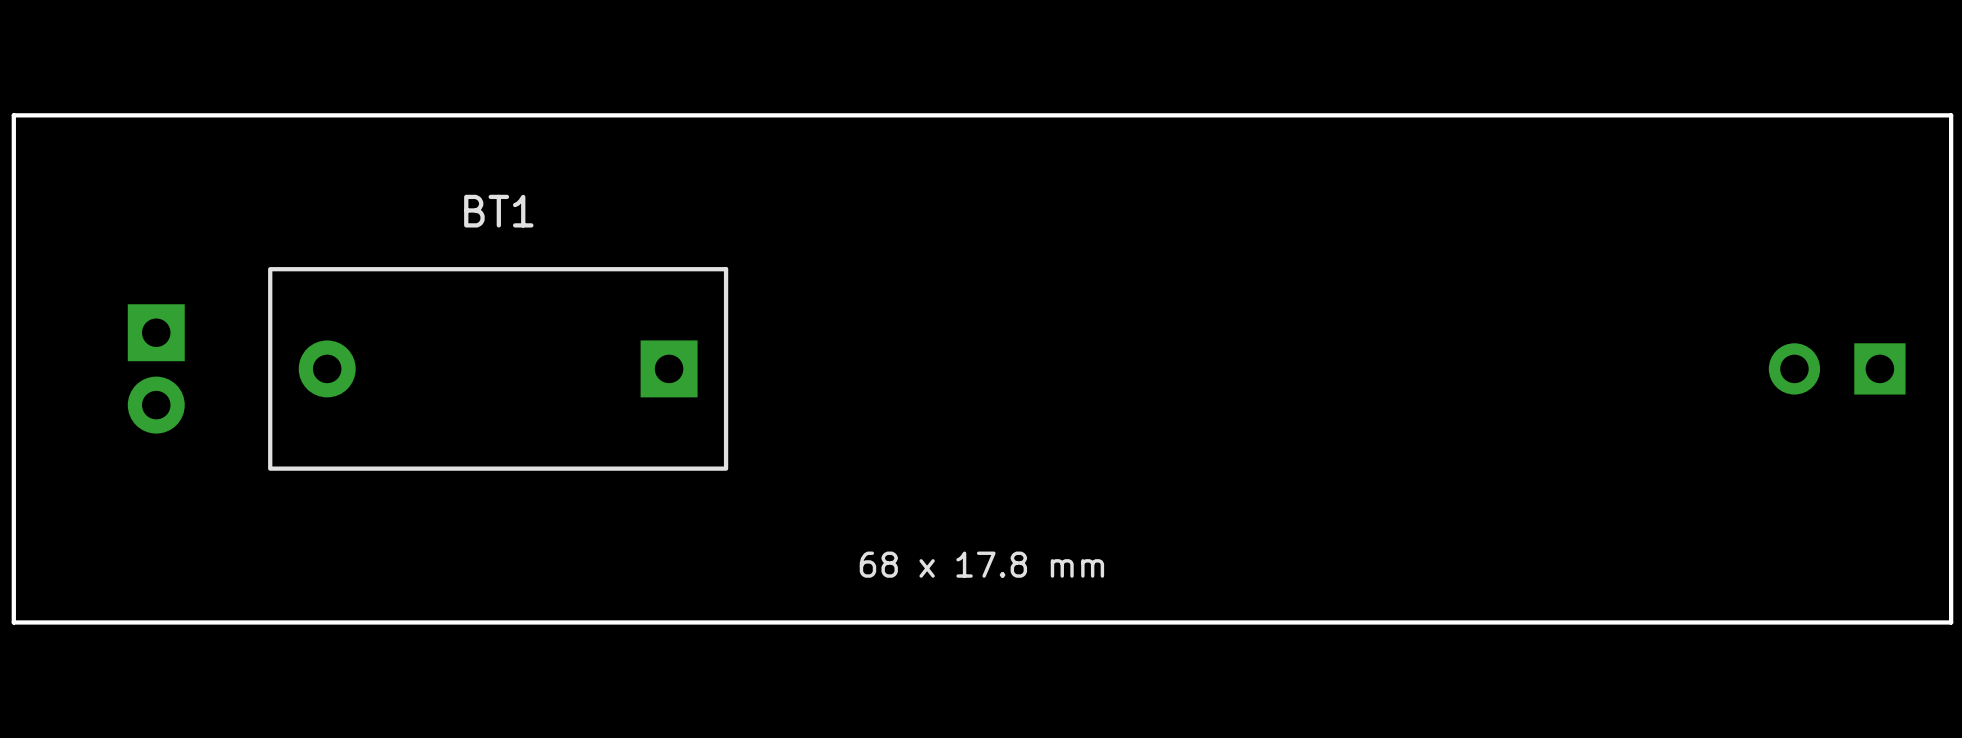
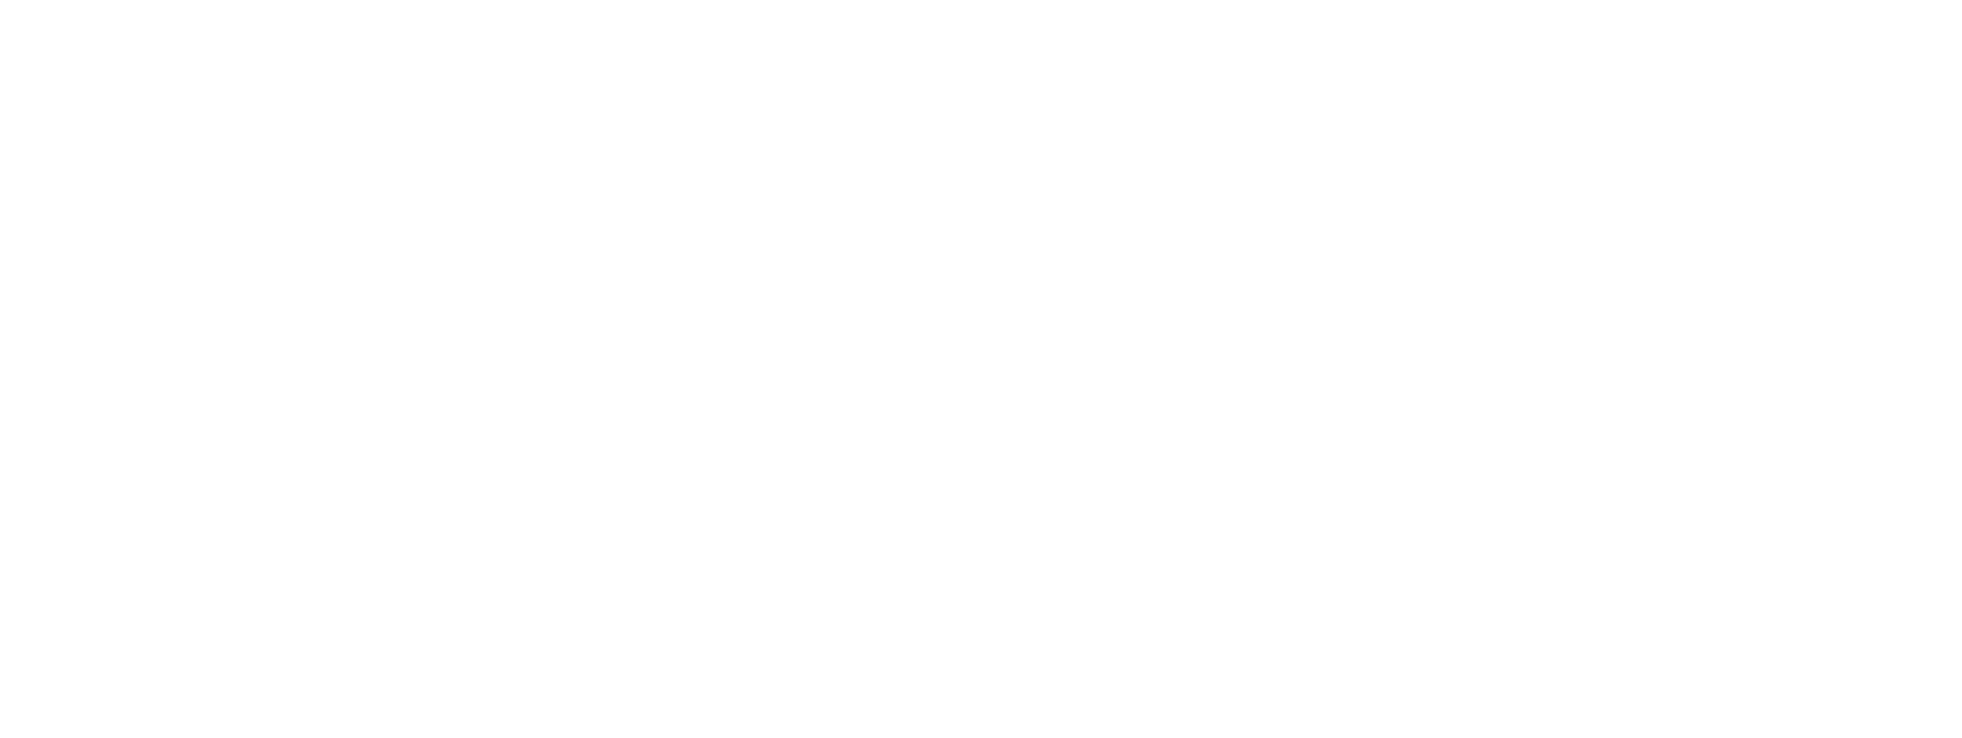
board edge: (1951, 115) (13, 115) (13, 622) (1951, 622) (1951, 115) -> none
part: (156, 368) -> none
BT1: (498, 368) -> none
part: (1837, 368) -> none
text: 68 x 17.8 mm (981, 564) -> none

